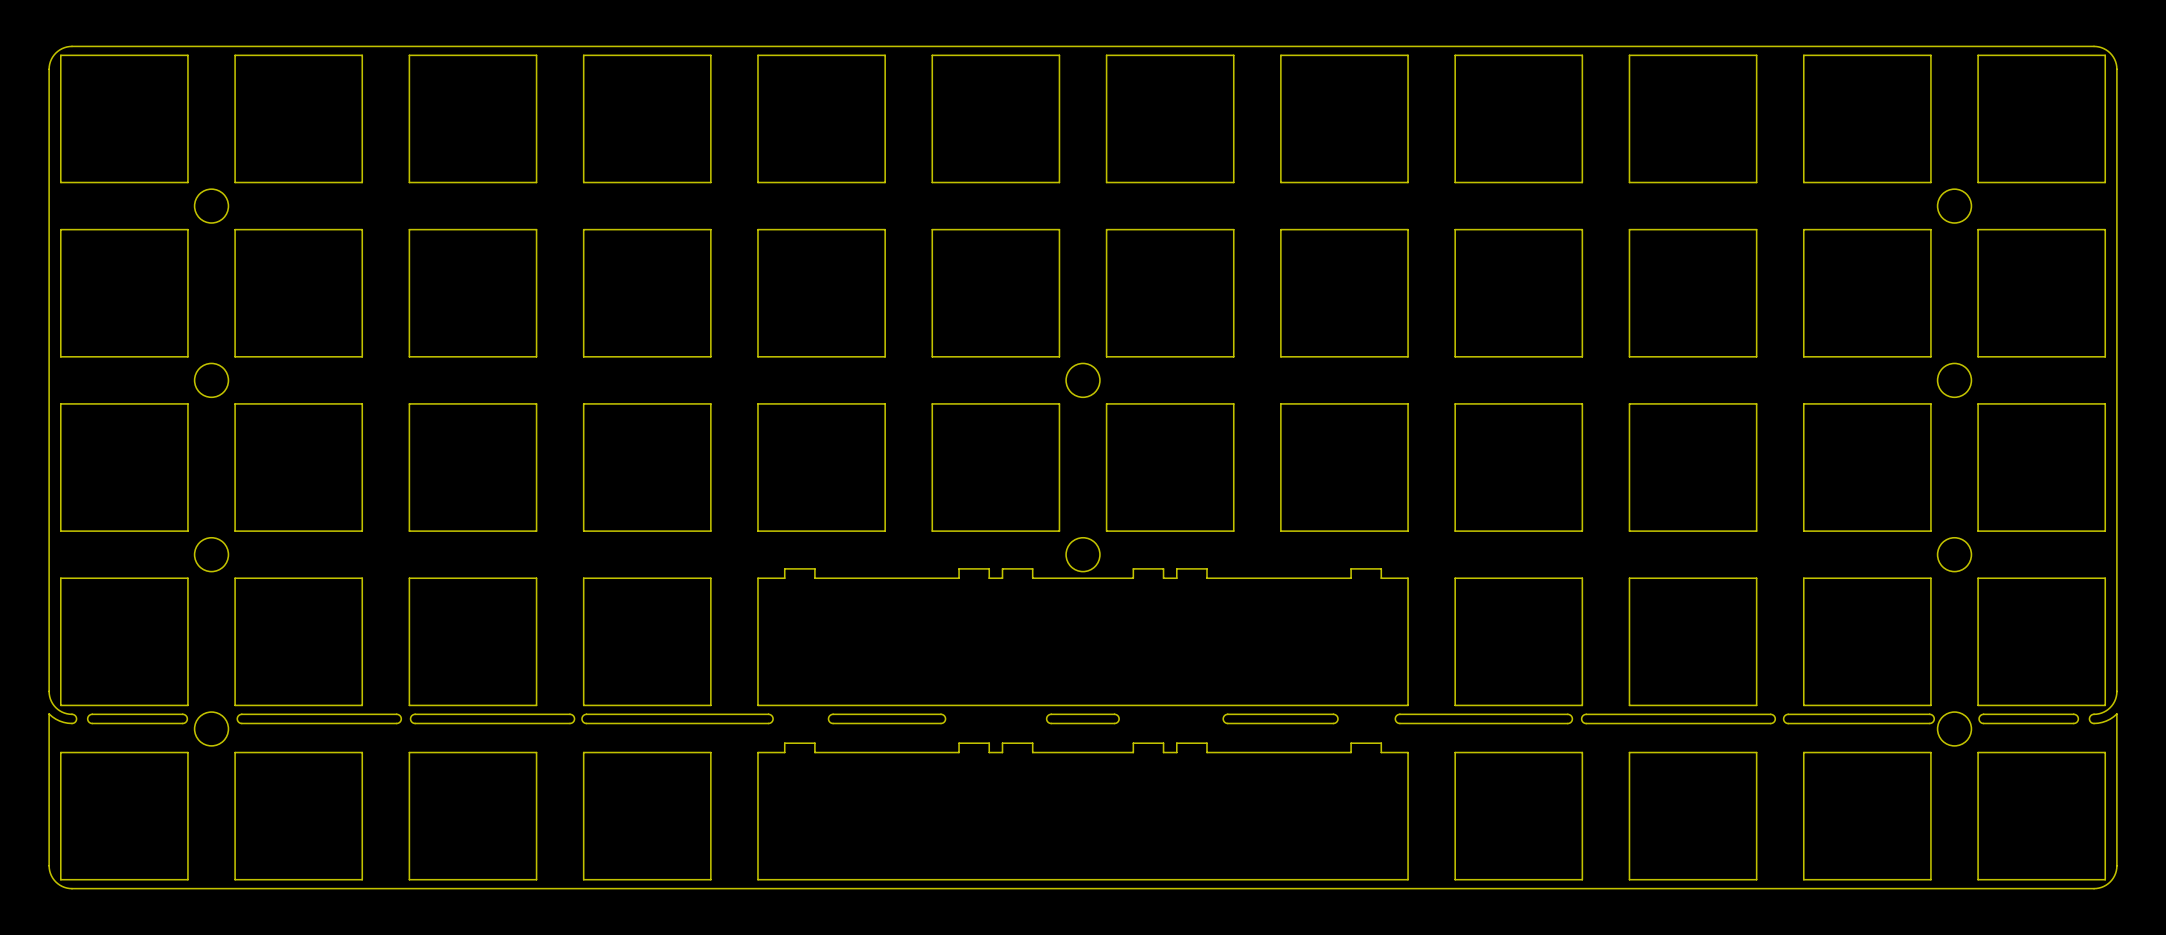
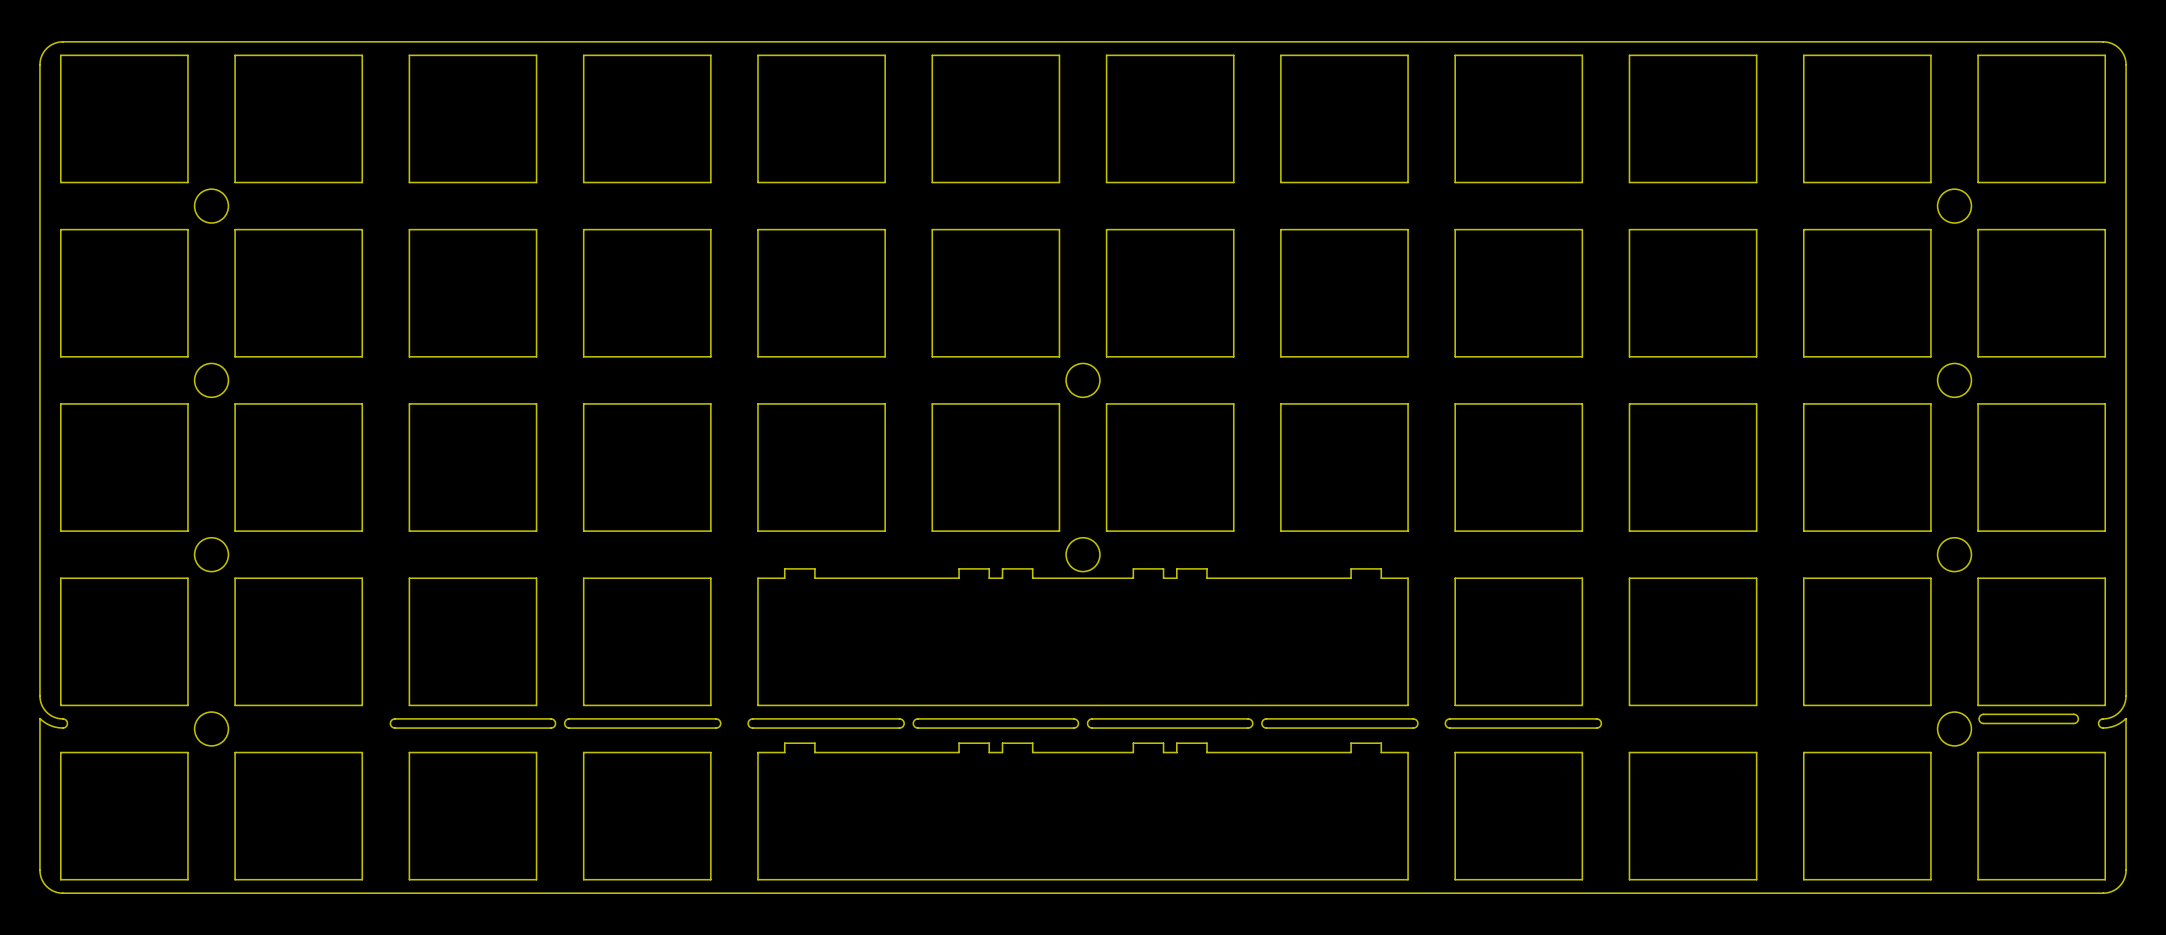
board edge: (92, 714) (182, 714) (187, 718) (182, 723) (92, 723) (87, 718) (92, 714) -> none
board edge: (241, 714) (396, 714) (401, 718) (396, 723) (241, 723) (237, 718) (241, 714) -> none
board edge: (415, 714) (569, 714) (574, 718) (569, 723) (415, 723) (410, 718) (415, 714) -> none
board edge: (586, 714) (768, 714) (773, 718) (768, 723) (586, 723) (581, 718) (586, 714) -> none
board edge: (833, 714) (940, 714) (945, 718) (940, 723) (833, 723) (828, 718) (833, 714) -> none
board edge: (1051, 714) (1115, 714) (1119, 719) (1114, 723) (1050, 723) (1046, 718) (1051, 714) -> none
board edge: (1227, 714) (1333, 714) (1337, 718) (1333, 723) (1227, 723) (1223, 718) (1227, 714) -> none
board edge: (1399, 714) (1567, 714) (1572, 718) (1567, 723) (1399, 723) (1395, 718) (1399, 714) -> none
board edge: (1586, 714) (1770, 714) (1775, 718) (1770, 723) (1586, 723) (1581, 718) (1586, 714) -> none
board edge: (1788, 714) (1929, 714) (1934, 718) (1929, 723) (1788, 723) (1783, 718) (1788, 714) -> none
board edge: none -> (394, 718) (550, 718) (555, 723) (550, 728) (394, 728) (390, 723) (394, 718)
board edge: none -> (569, 718) (716, 718) (720, 723) (716, 728) (569, 728) (564, 723) (569, 718)
board edge: none -> (752, 718) (899, 718) (904, 723) (899, 728) (752, 728) (748, 723) (752, 718)
board edge: none -> (917, 718) (1073, 718) (1078, 723) (1073, 728) (917, 728) (913, 723) (917, 718)
board edge: none -> (1092, 718) (1248, 718) (1252, 723) (1248, 728) (1092, 728) (1087, 723) (1092, 718)
board edge: none -> (1266, 718) (1413, 718) (1417, 723) (1413, 728) (1266, 728) (1261, 723) (1266, 718)
board edge: none -> (1449, 718) (1596, 718) (1601, 723) (1596, 728) (1449, 728) (1445, 723) (1449, 718)
board edge: (71, 723) (59, 721) (49, 713) (49, 868) (52, 877) (57, 883) (71, 888) (2096, 888) (2110, 881) (2116, 868) (2116, 713) (2106, 721) (2094, 723) -> none
board edge: (71, 723) (76, 721) (75, 716) (62, 712) (55, 707) (51, 701) (49, 691) (49, 69) (50, 61) (55, 53) (64, 47) (71, 46) (2101, 47) (2113, 57) (2116, 69) (2116, 691) (2114, 701) (2110, 707) (2103, 712) (2090, 716) (2089, 721) (2094, 723) -> none
board edge: none -> (62, 728) (50, 725) (39, 718) (40, 872) (43, 882) (48, 888) (62, 893) (2105, 893) (2119, 886) (2125, 872) (2126, 718) (2115, 725) (2103, 728)
board edge: none -> (62, 728) (67, 725) (66, 720) (52, 716) (46, 712) (42, 705) (39, 696) (39, 64) (41, 57) (46, 48) (55, 43) (62, 41) (2110, 43) (2121, 50) (2126, 64) (2126, 696) (2123, 705) (2119, 712) (2113, 716) (2099, 720) (2099, 725) (2103, 728)

